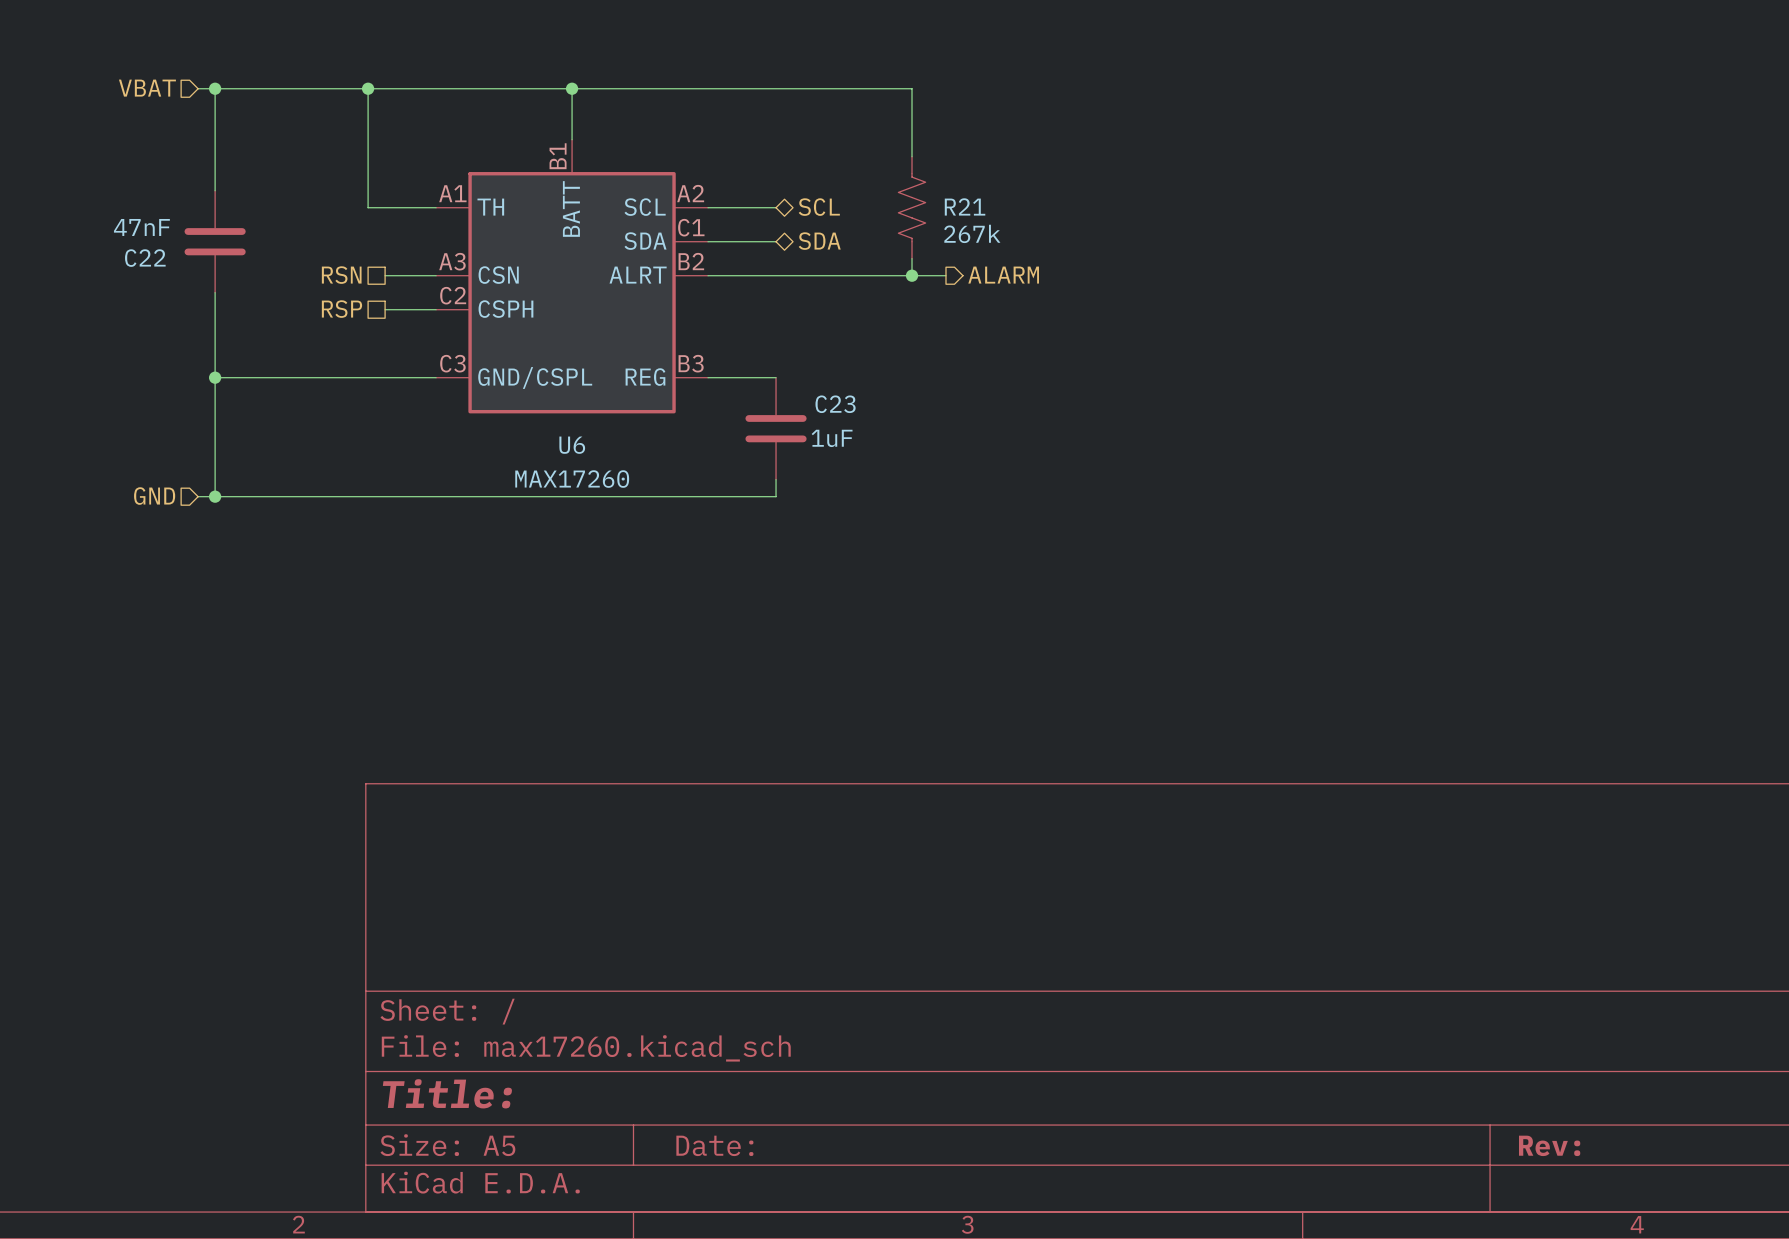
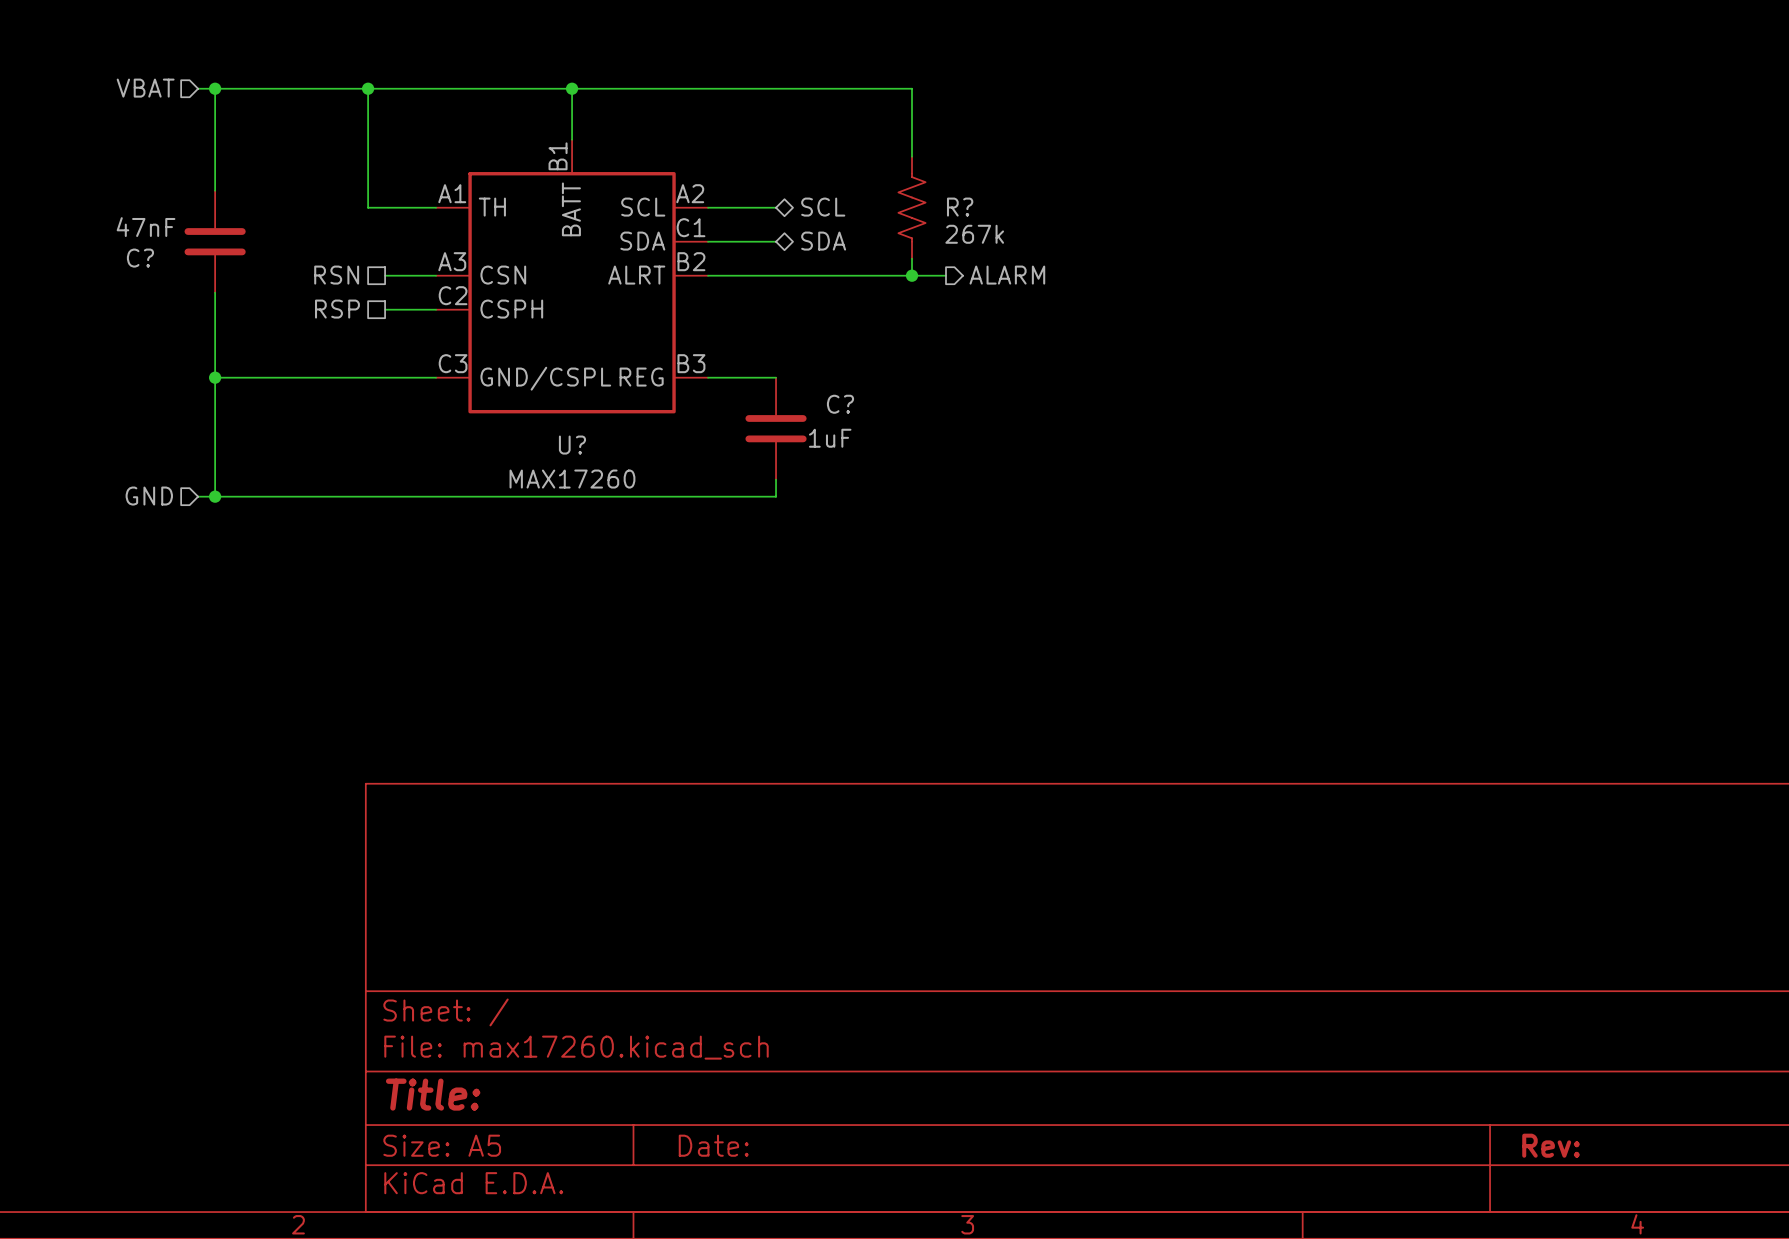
R21 name: R21 (965, 206) -> R? (960, 207)
C22 name: C22 (145, 258) -> C? (140, 258)
C23 name: C23 (835, 404) -> C? (840, 404)
U6 name: U6 (572, 445) -> U? (572, 445)

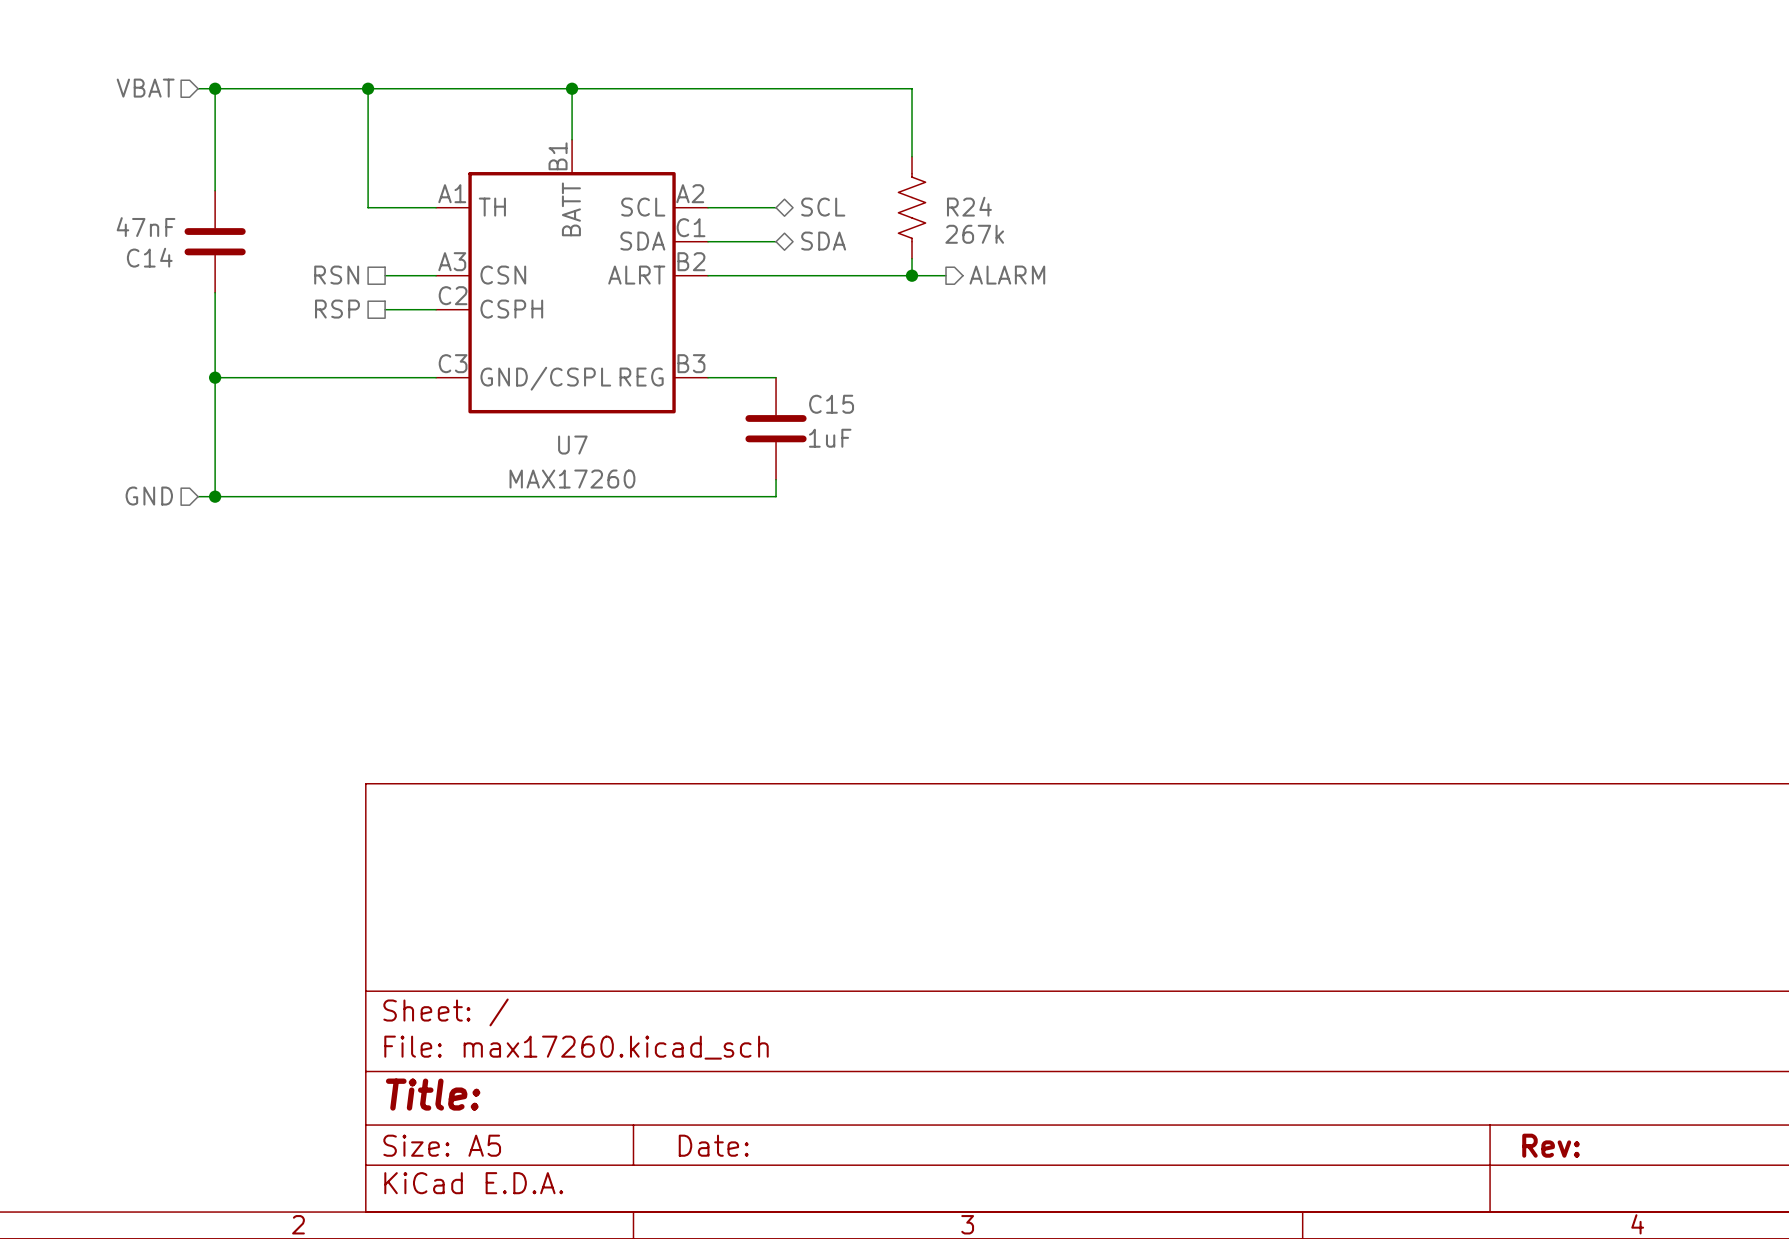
R? name: R? (960, 207) -> R24 (969, 206)
C? name: C? (140, 258) -> C14 (149, 257)
C? name: C? (840, 404) -> C15 (831, 404)
U? name: U? (572, 445) -> U7 (572, 445)

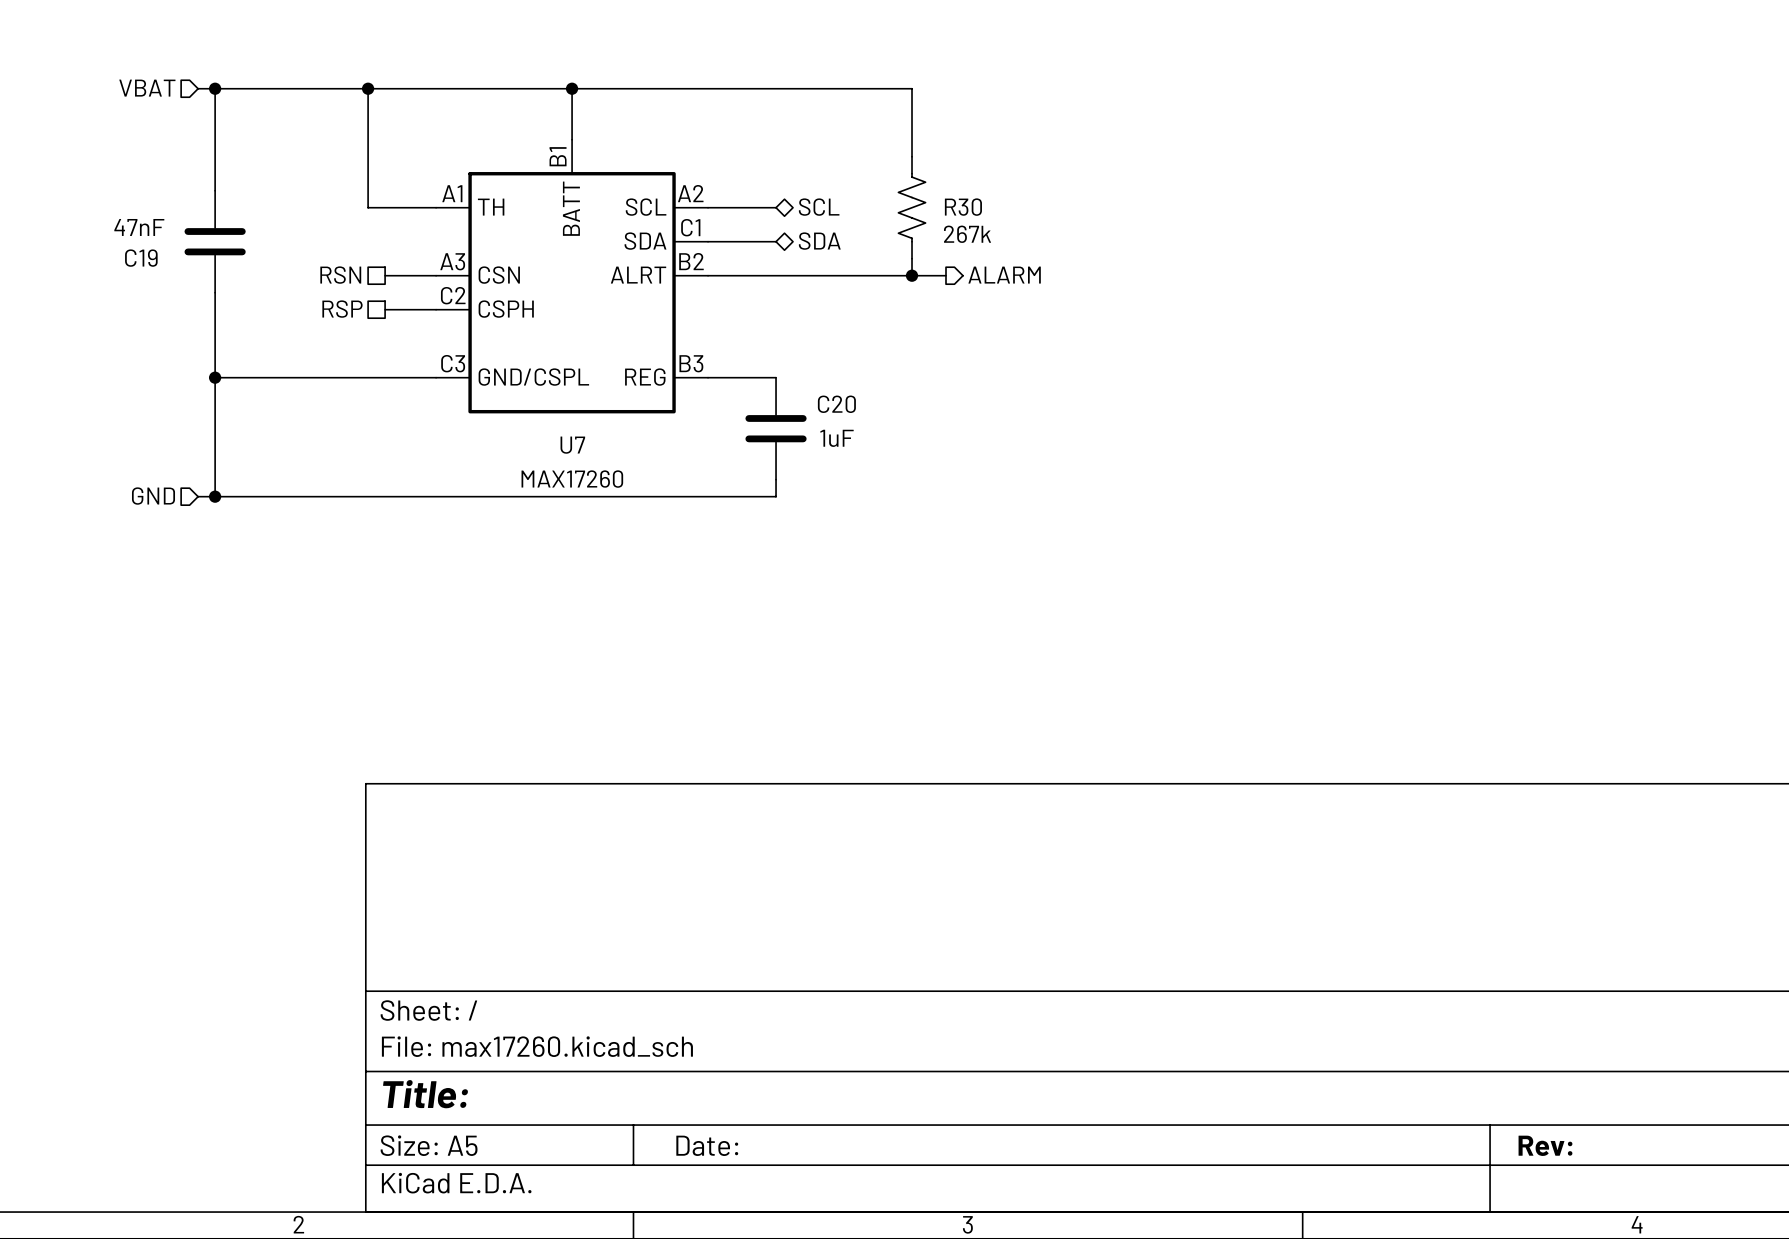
R24 name: R24 (969, 206) -> R30 (963, 207)
C14 name: C14 (149, 257) -> C19 (141, 258)
C15 name: C15 (831, 404) -> C20 (836, 404)

